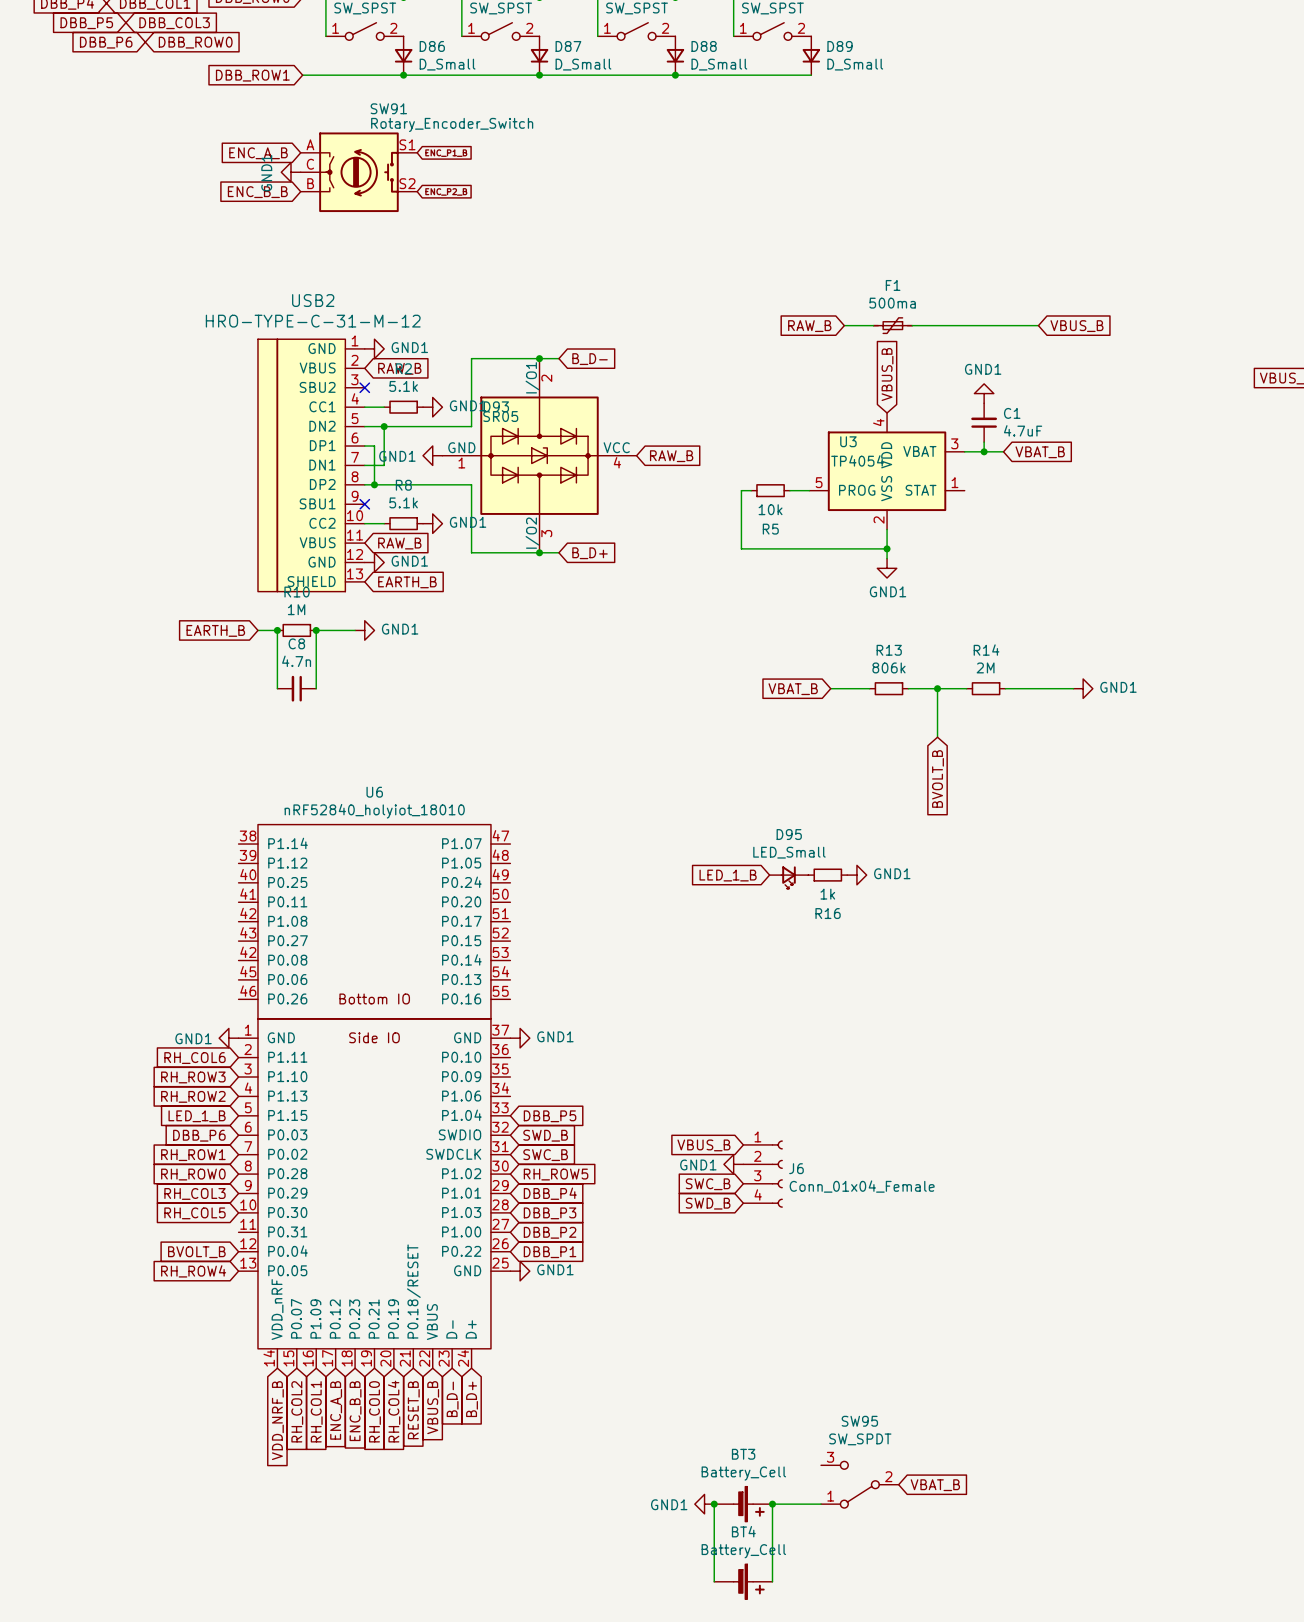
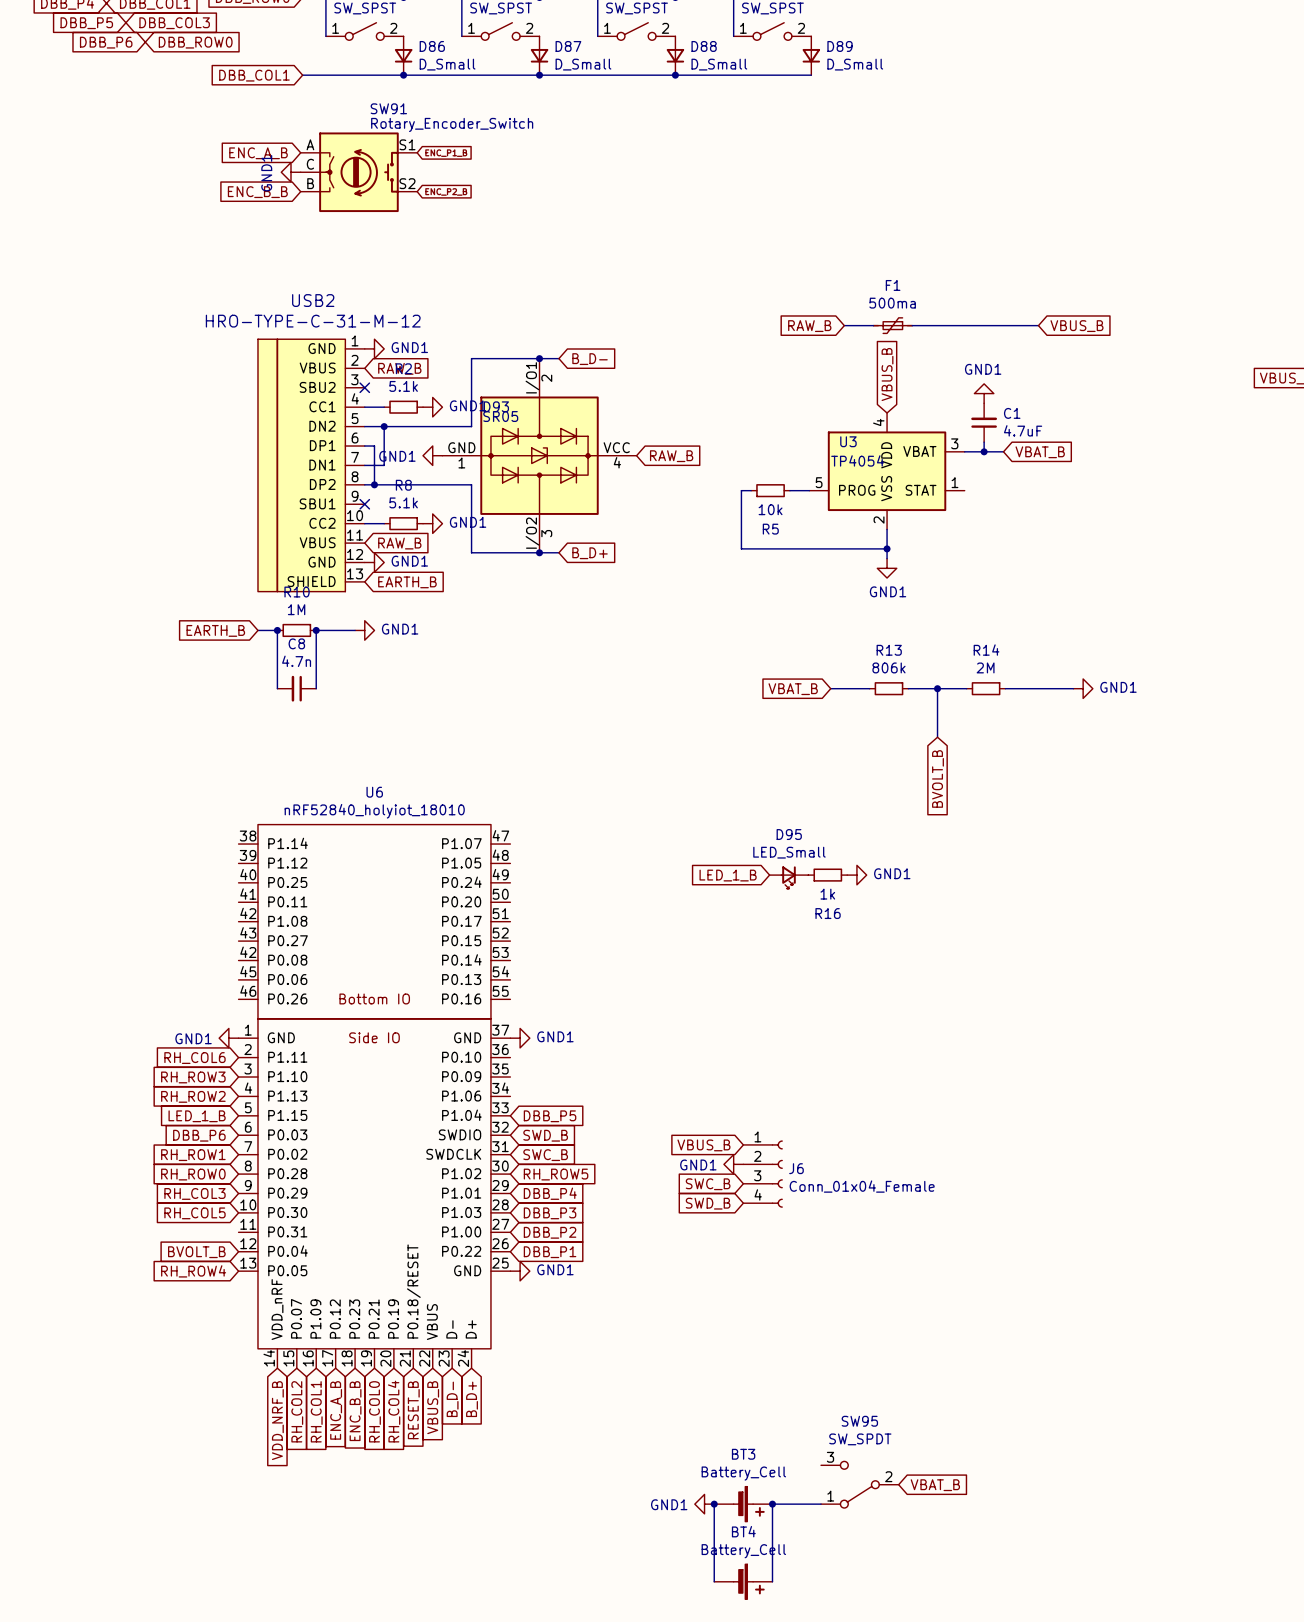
global label: DBB_ROW1 (252, 75) -> DBB_COL1 (254, 75)

